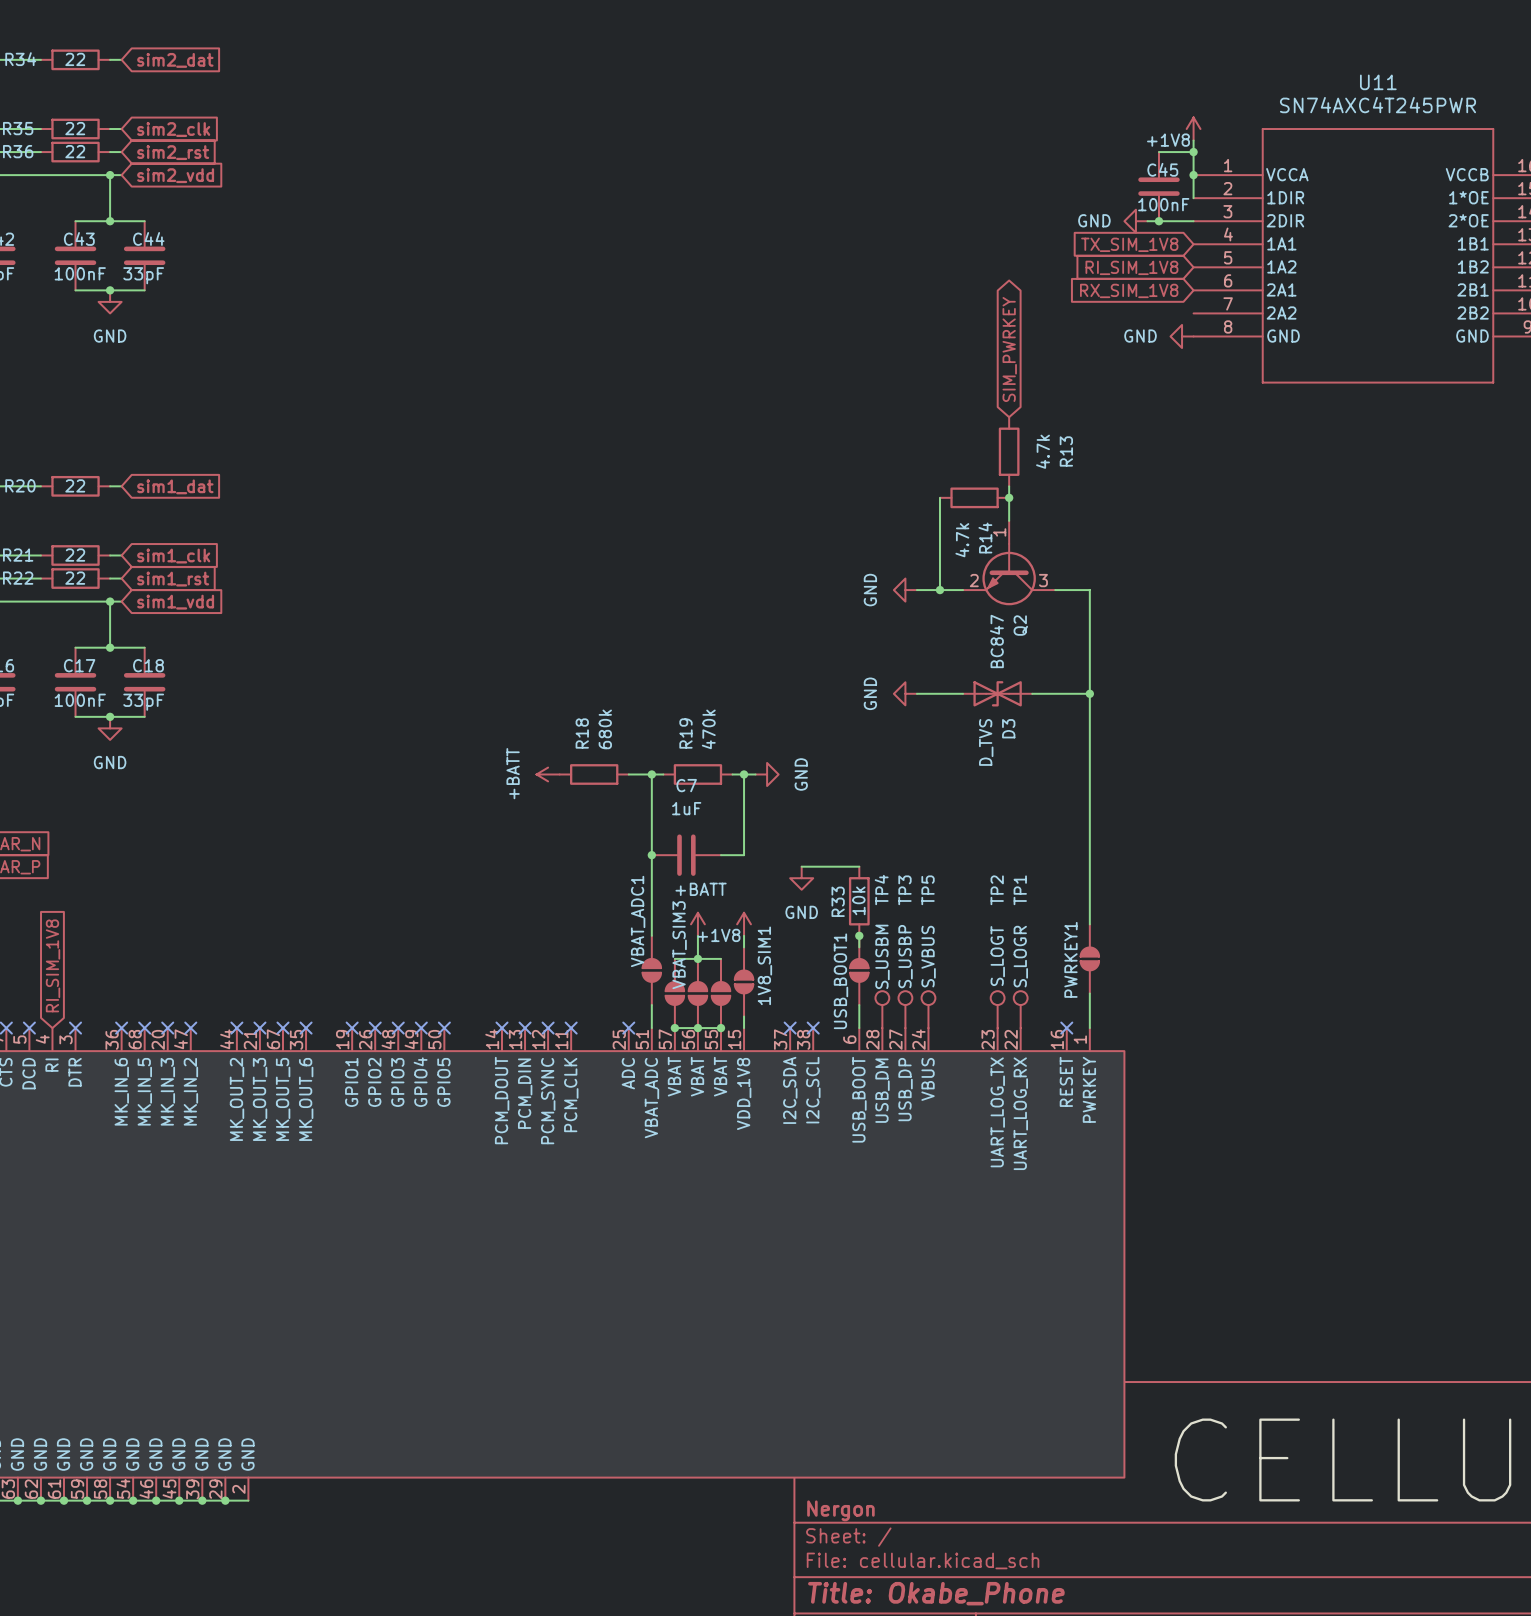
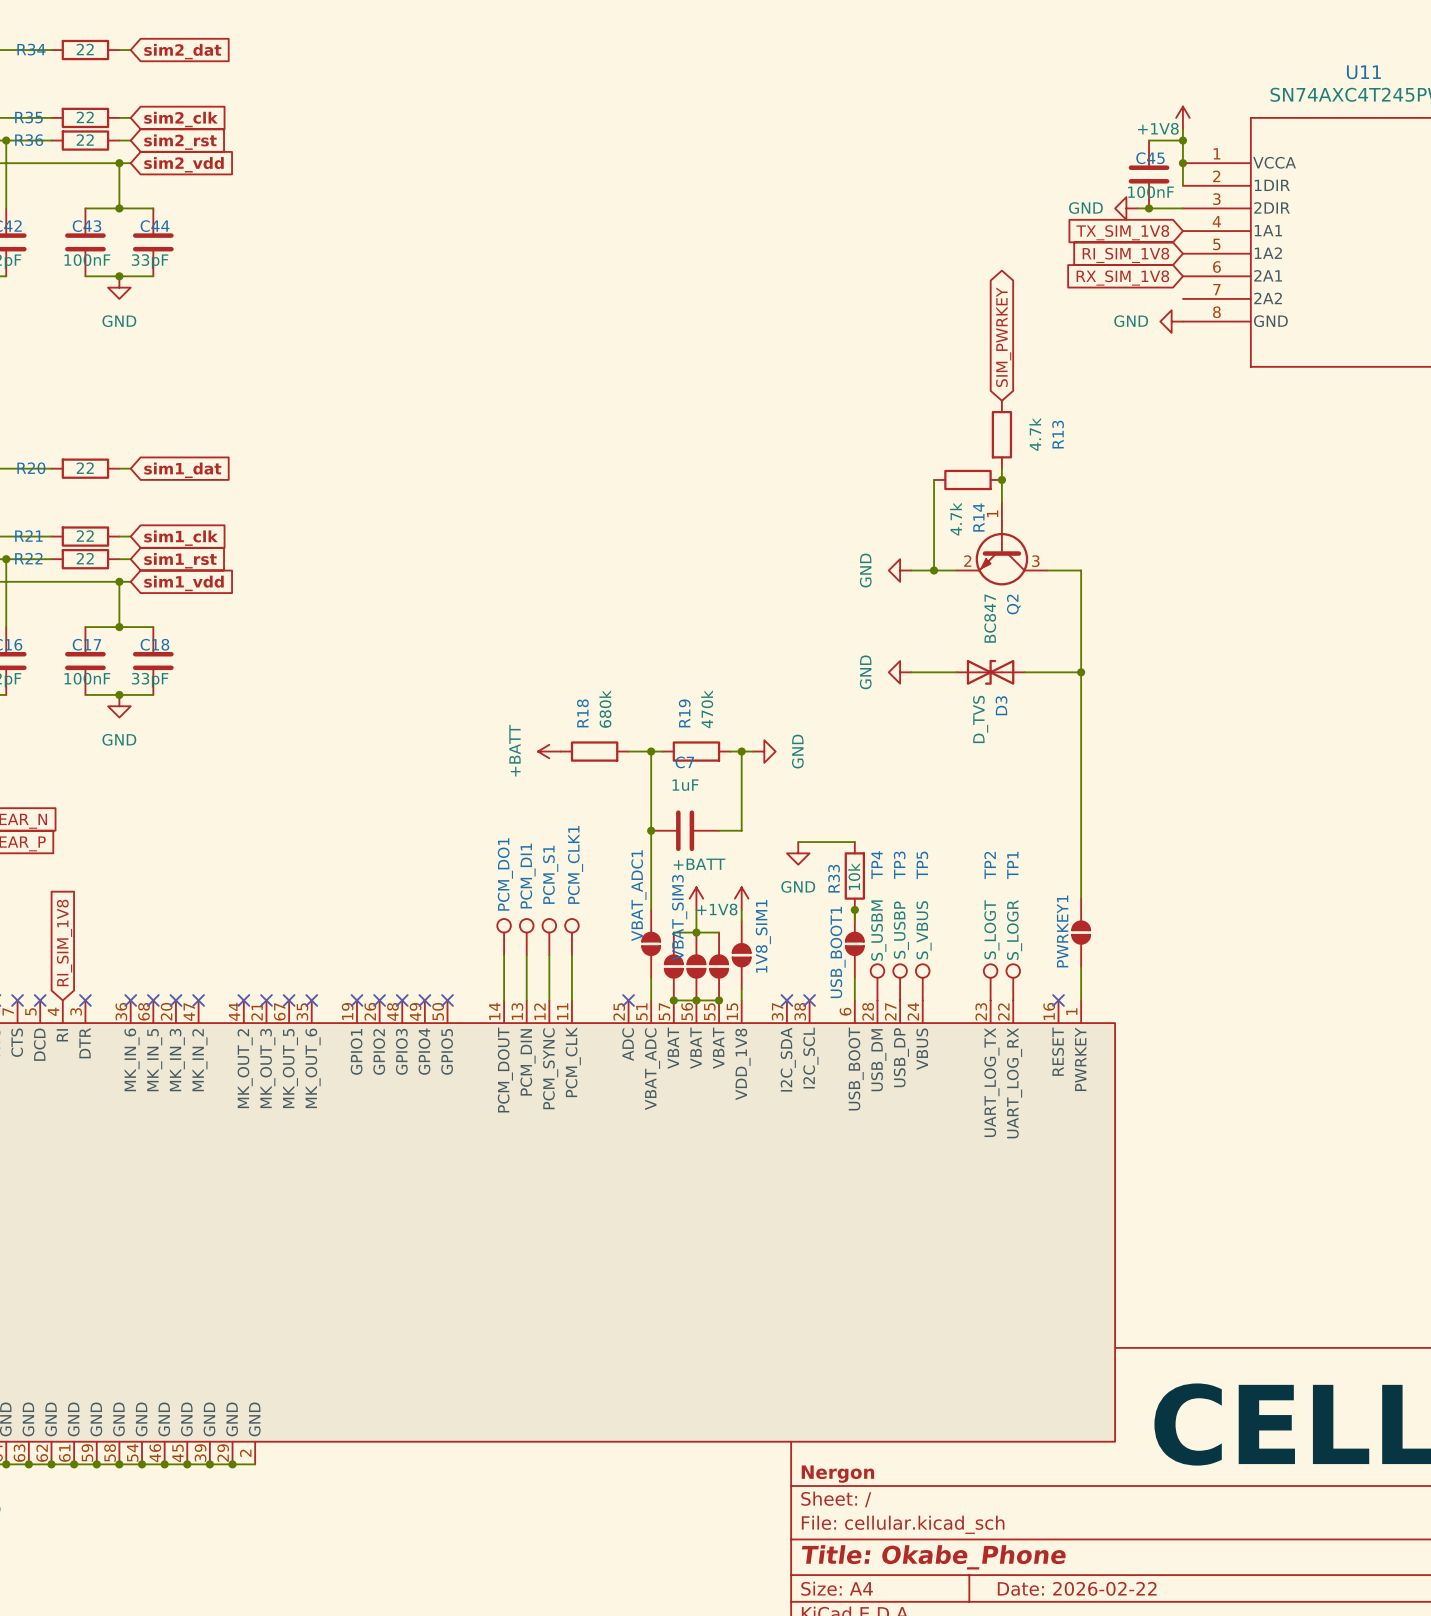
PCM_DO1: none -> (504, 937)
PCM_DI1: none -> (526, 937)
PCM_S1: none -> (549, 937)
PCM_CLK1: none -> (571, 937)
wire: none -> (504, 955) (504, 1000)
wire: none -> (526, 955) (526, 1000)
wire: none -> (549, 955) (549, 1000)
wire: none -> (571, 955) (571, 1000)
no-connect mark: (501, 1028) -> none
no-connect mark: (525, 1028) -> none
no-connect mark: (548, 1028) -> none
no-connect mark: (571, 1028) -> none

